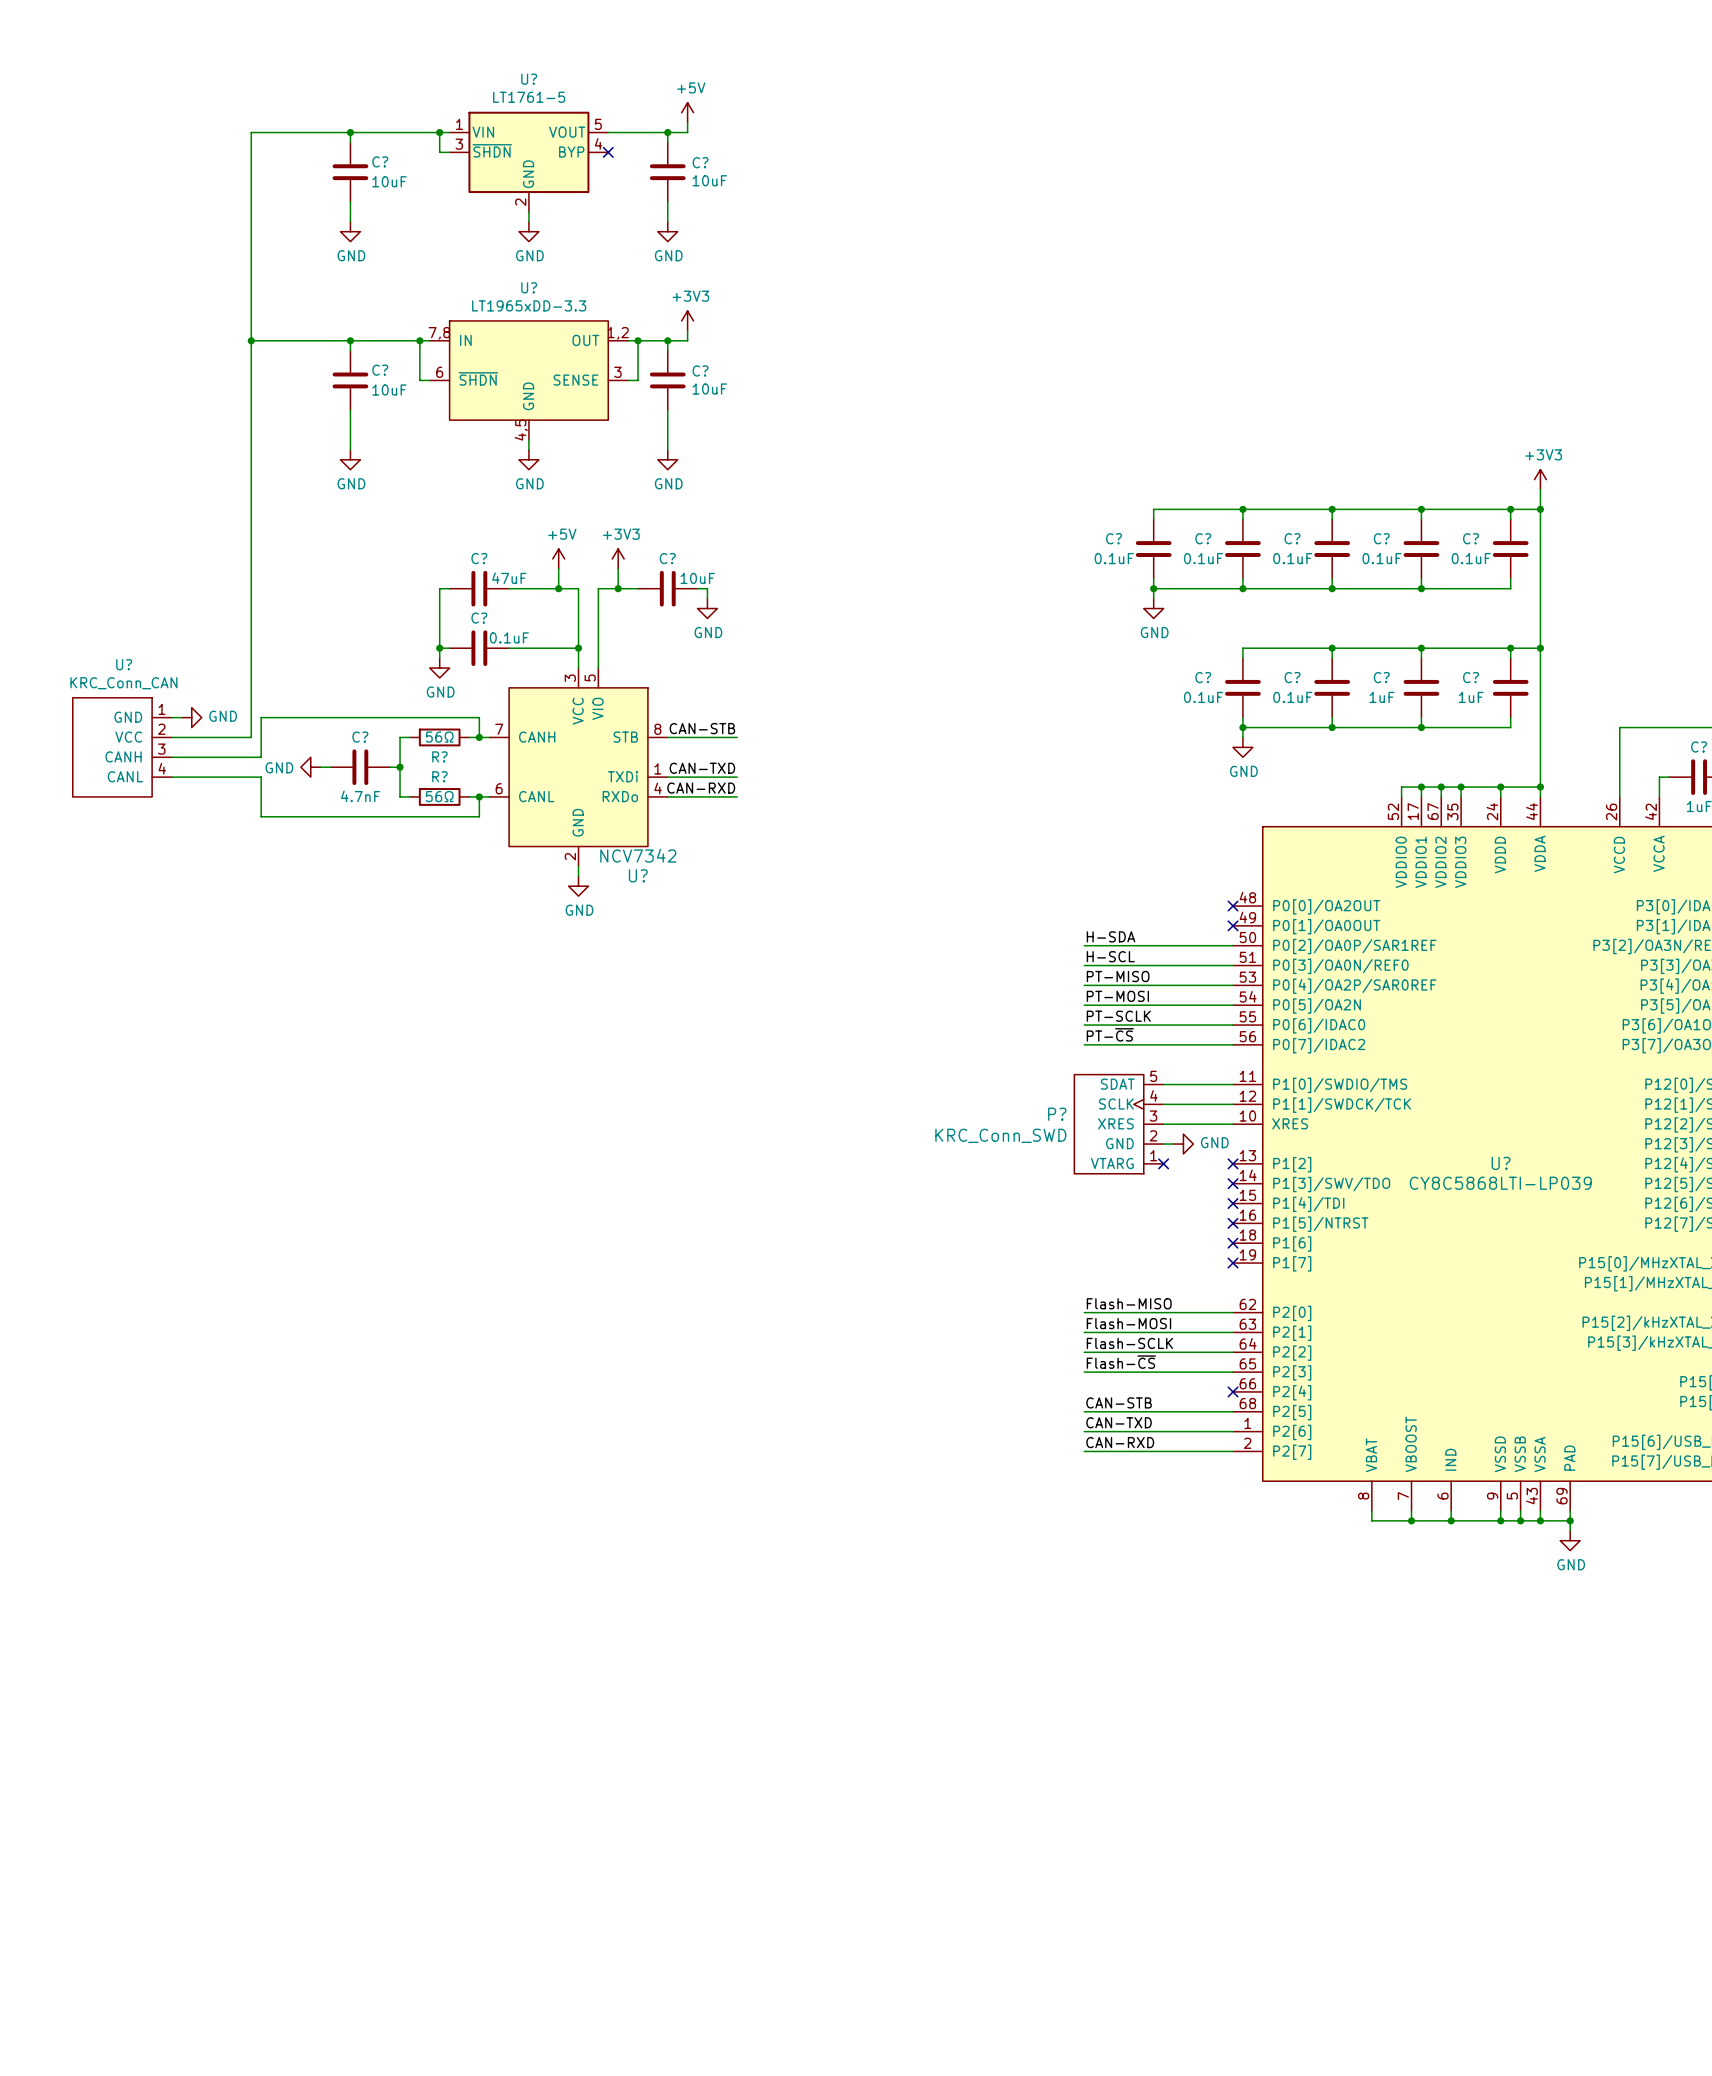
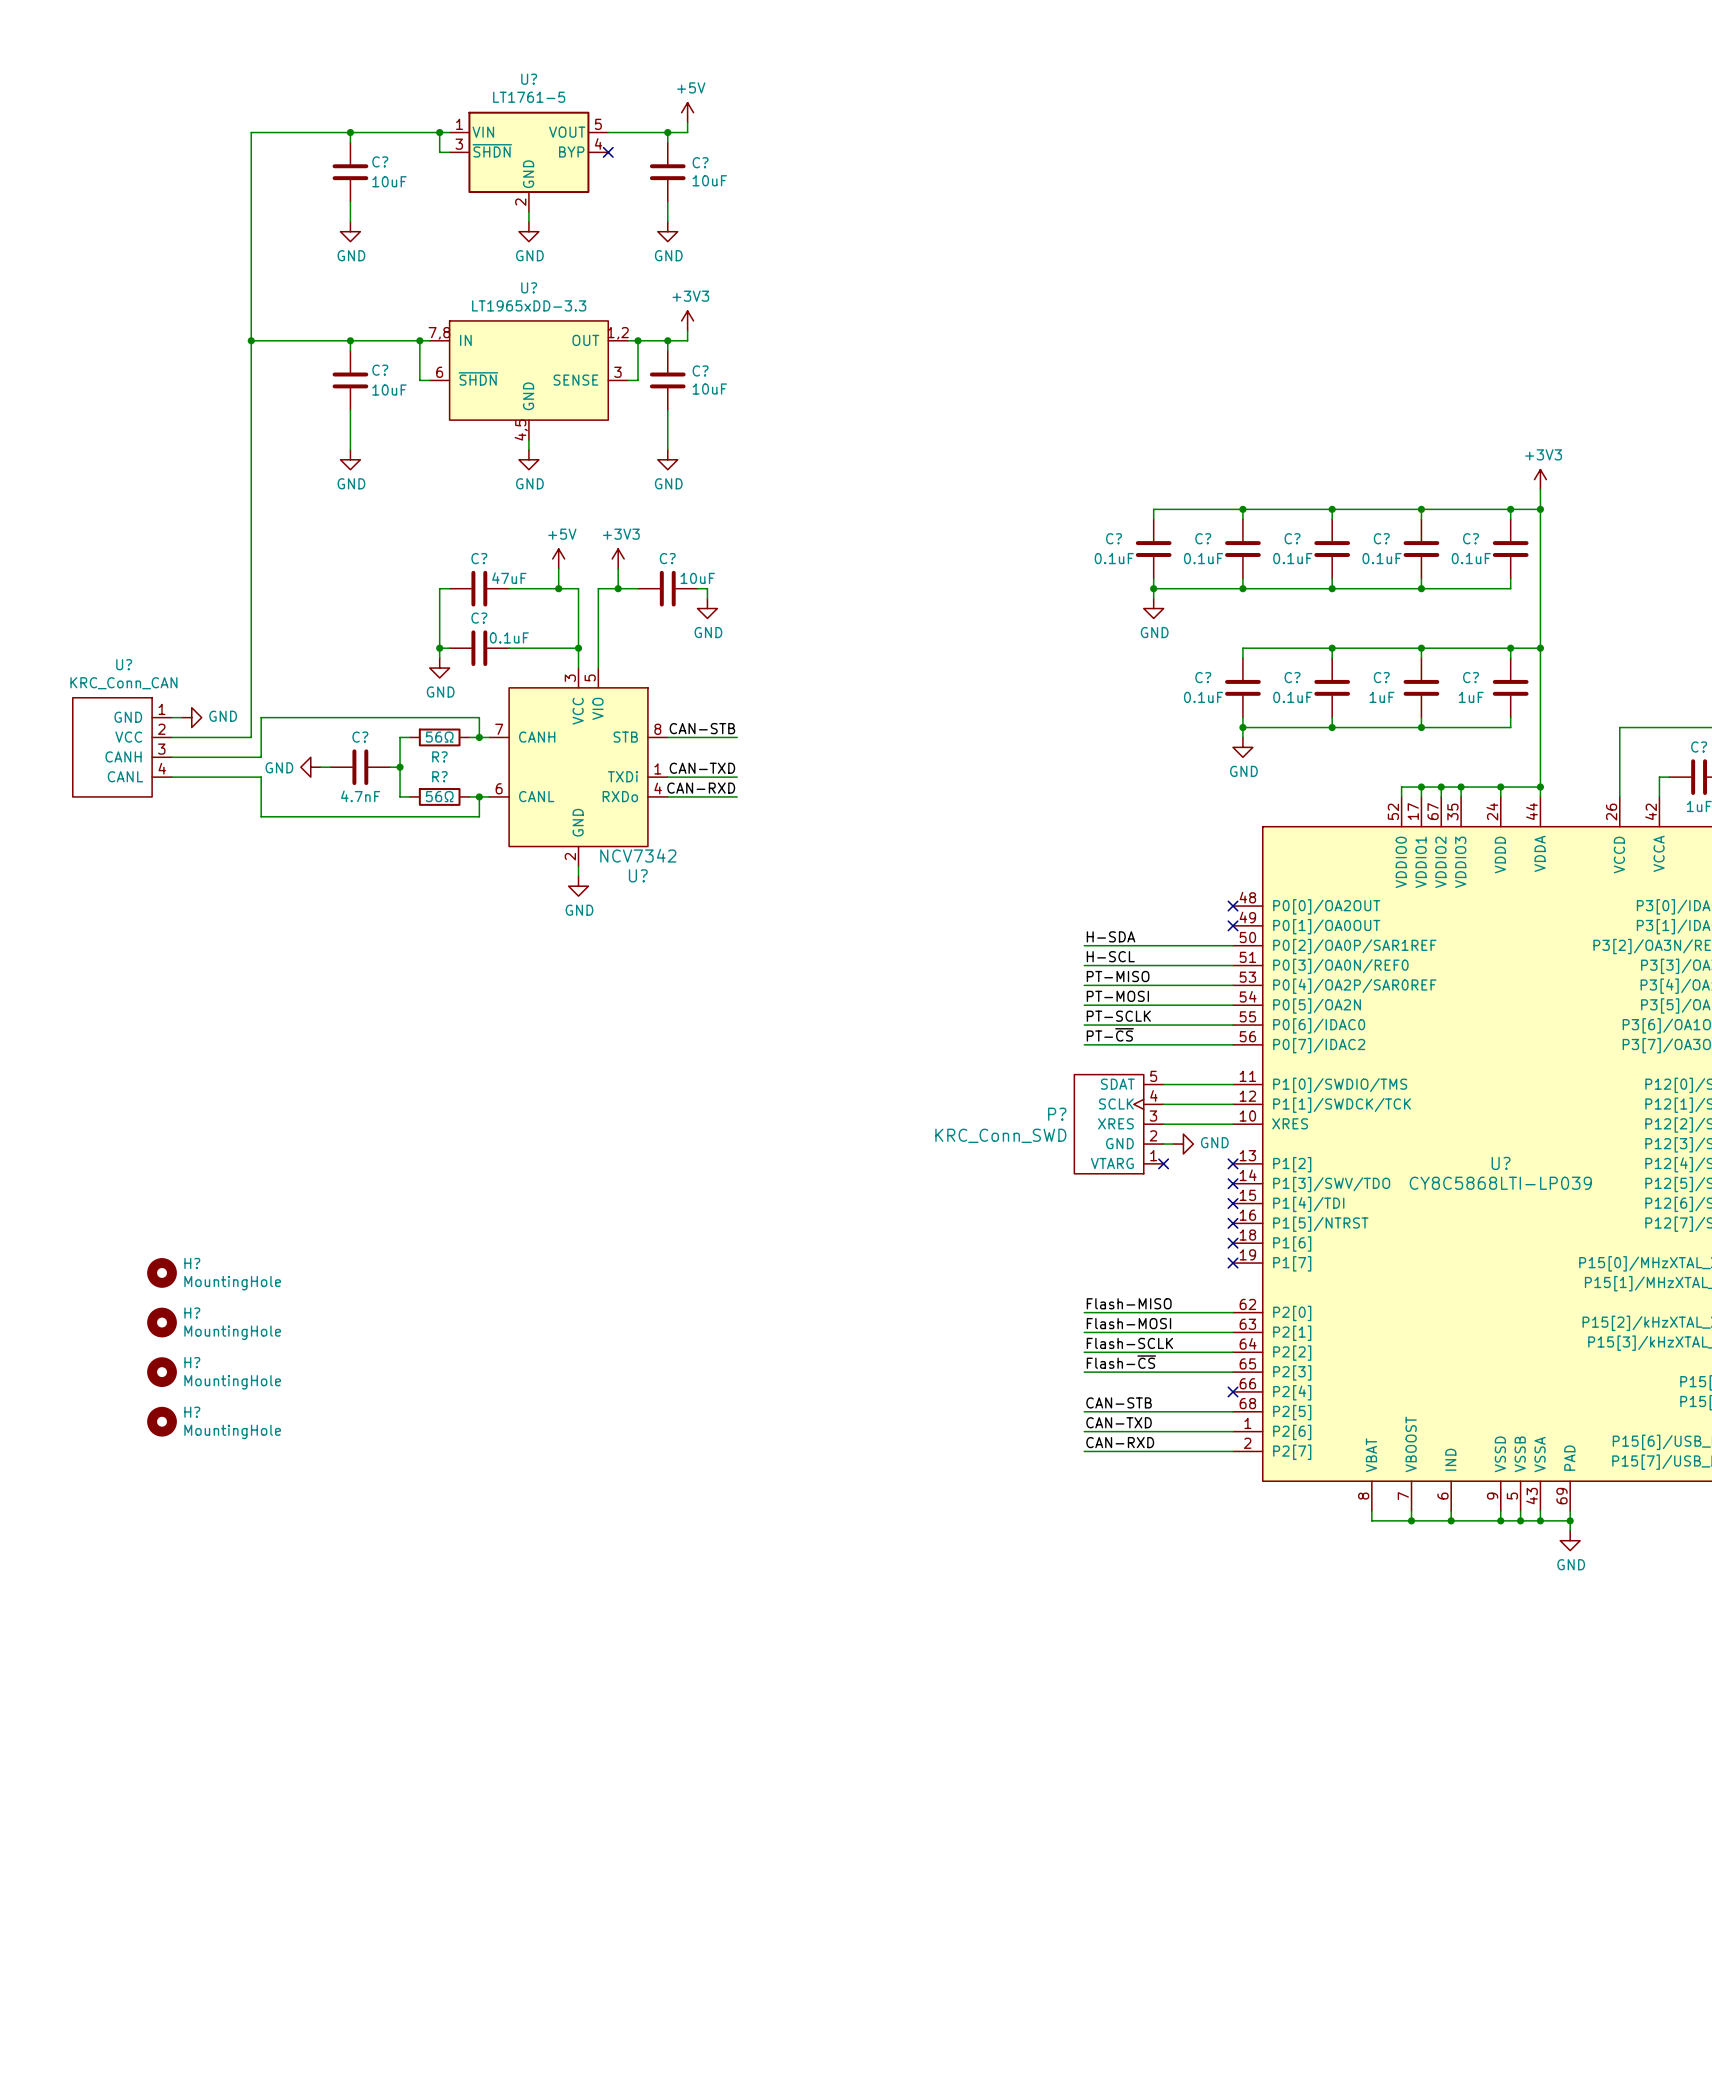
H?: none -> MountingHole (162, 1272)
H?: none -> MountingHole (162, 1322)
H?: none -> MountingHole (162, 1372)
H?: none -> MountingHole (162, 1421)

